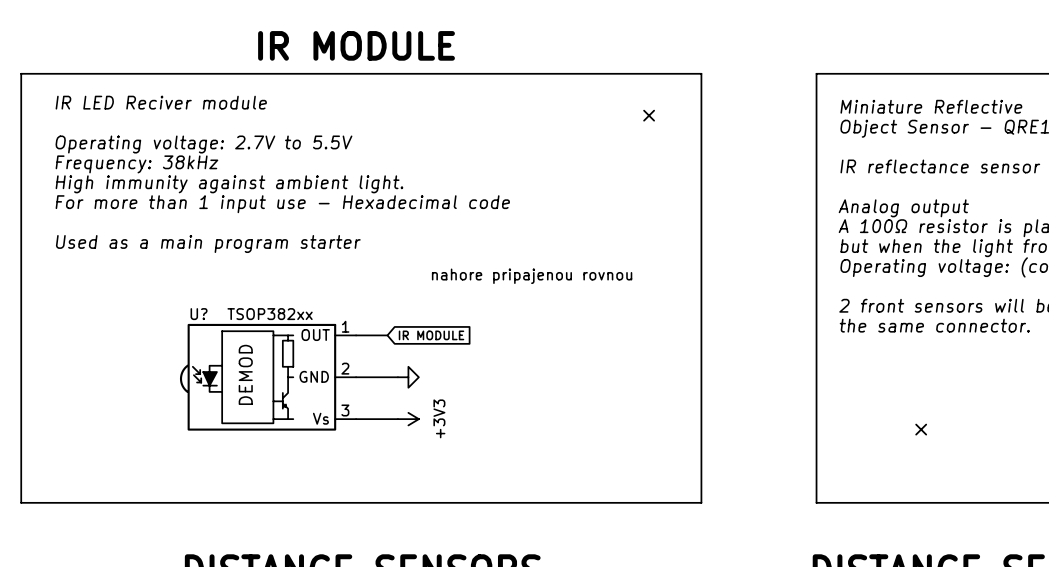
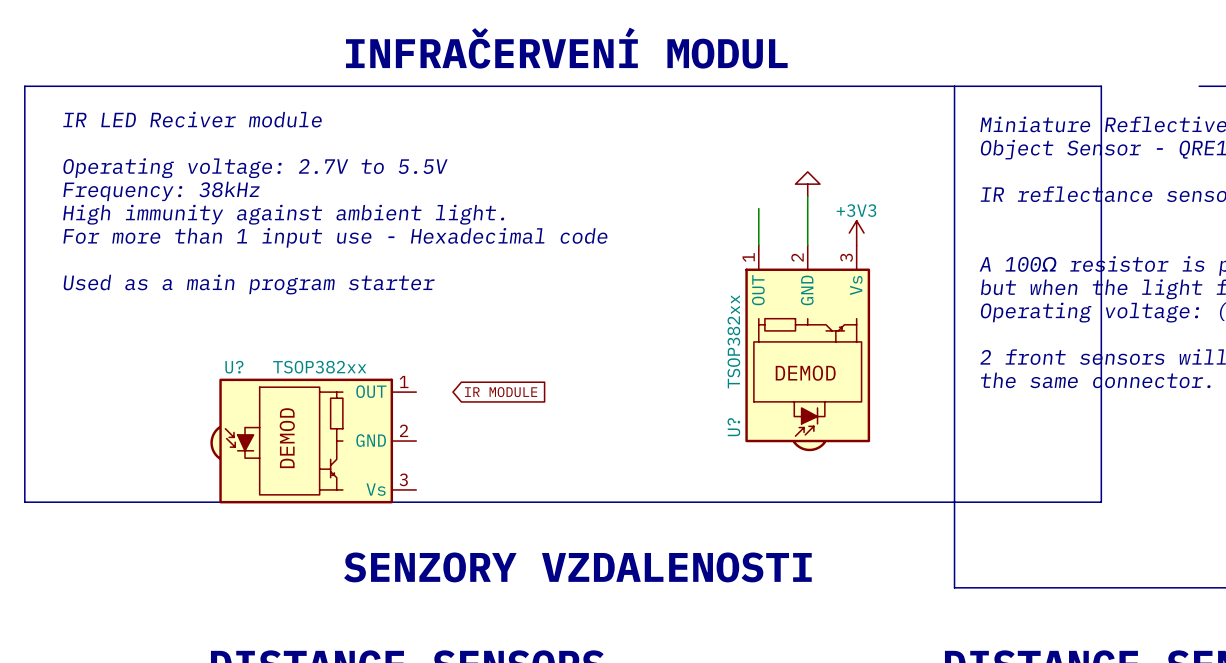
text: none -> INFRAČERVENÍ MODUL (566, 48)
text: IR MODULE (356, 45) -> none
line: (701, 73) (701, 502) (21, 502) (21, 429) -> (1101, 86) (1101, 502) (24, 502)
line: none -> (819, 86) (954, 86)
line: (942, 73) (1025, 73) -> none
no-connect mark: (649, 115) -> none
power symbol: none -> (807, 184)
wire: none -> (807, 196) (807, 245)
wire: none -> (758, 208) (758, 245)
power symbol: none -> +3V3 (856, 233)
text: Analog output (903, 208) -> none
text: nahore pripajenou rovnou (532, 276) -> none
U?: none -> TSOP382xx (807, 348)
wire: (356, 335) (387, 335) -> none
wire: (356, 377) (397, 377) -> none
power symbol: (408, 377) -> none
wire: (356, 419) (397, 419) -> none
power symbol: +3V3 (408, 419) -> none
no-connect mark: (921, 429) -> none
text: none -> SENZORY VZDALENOSTI (577, 567)

